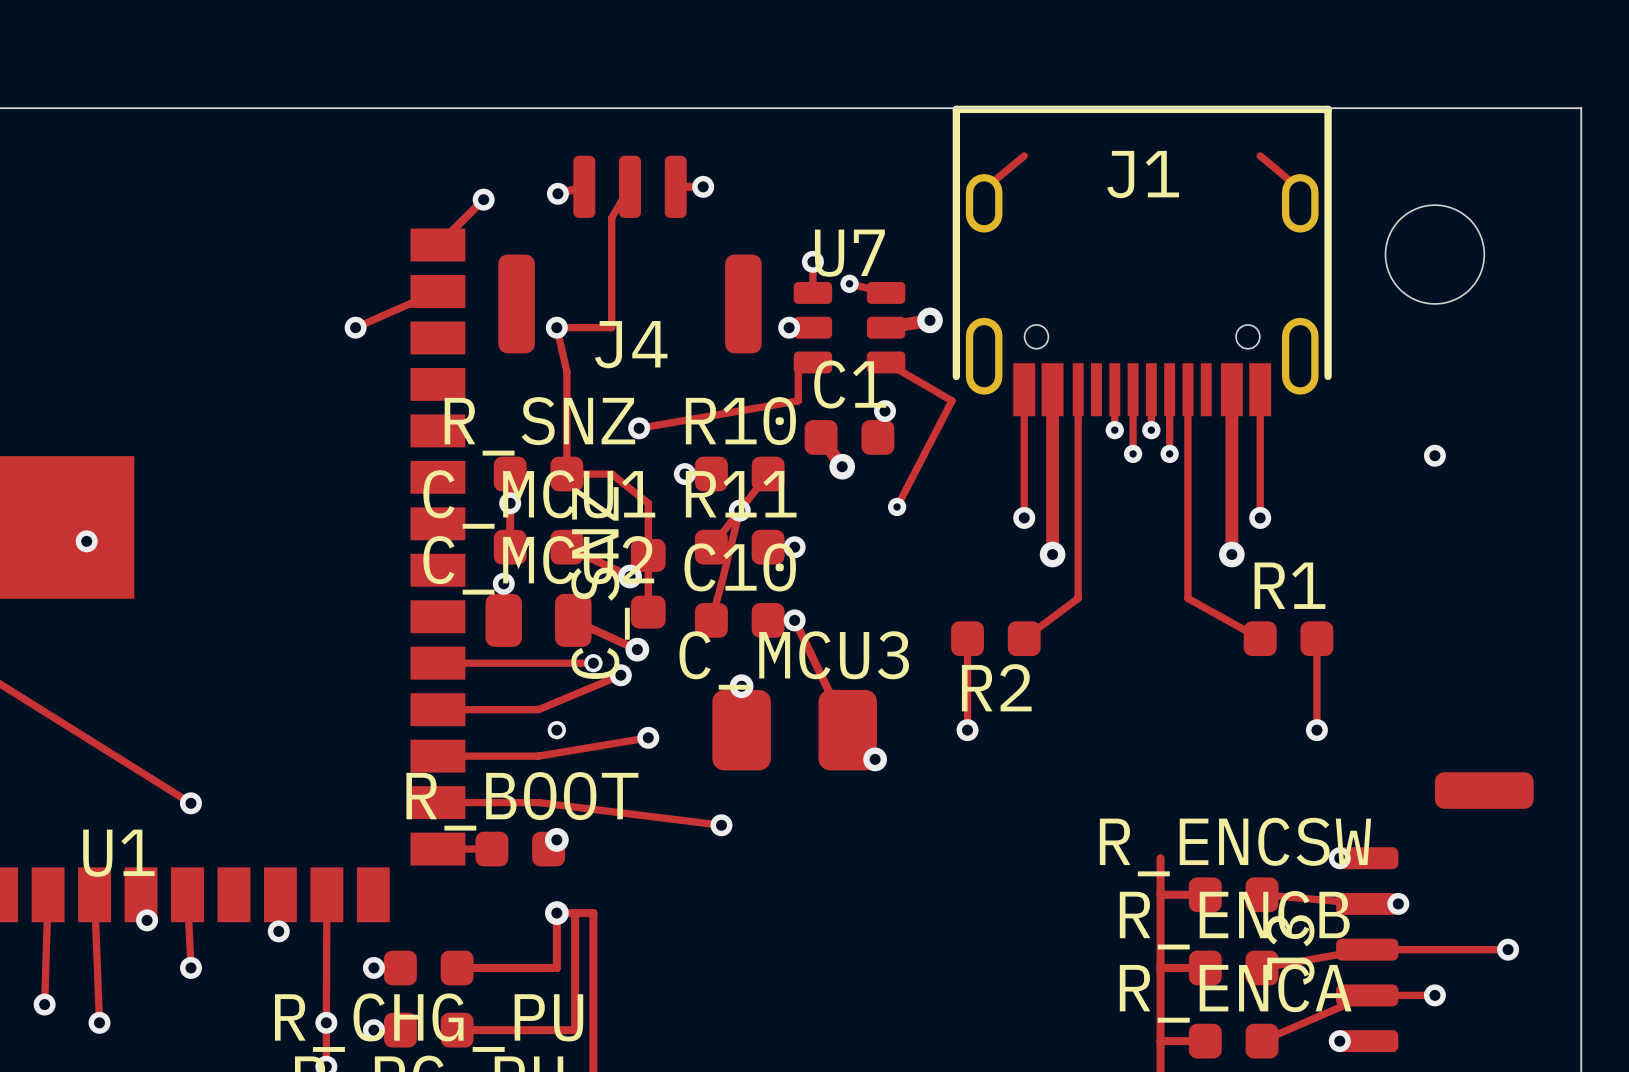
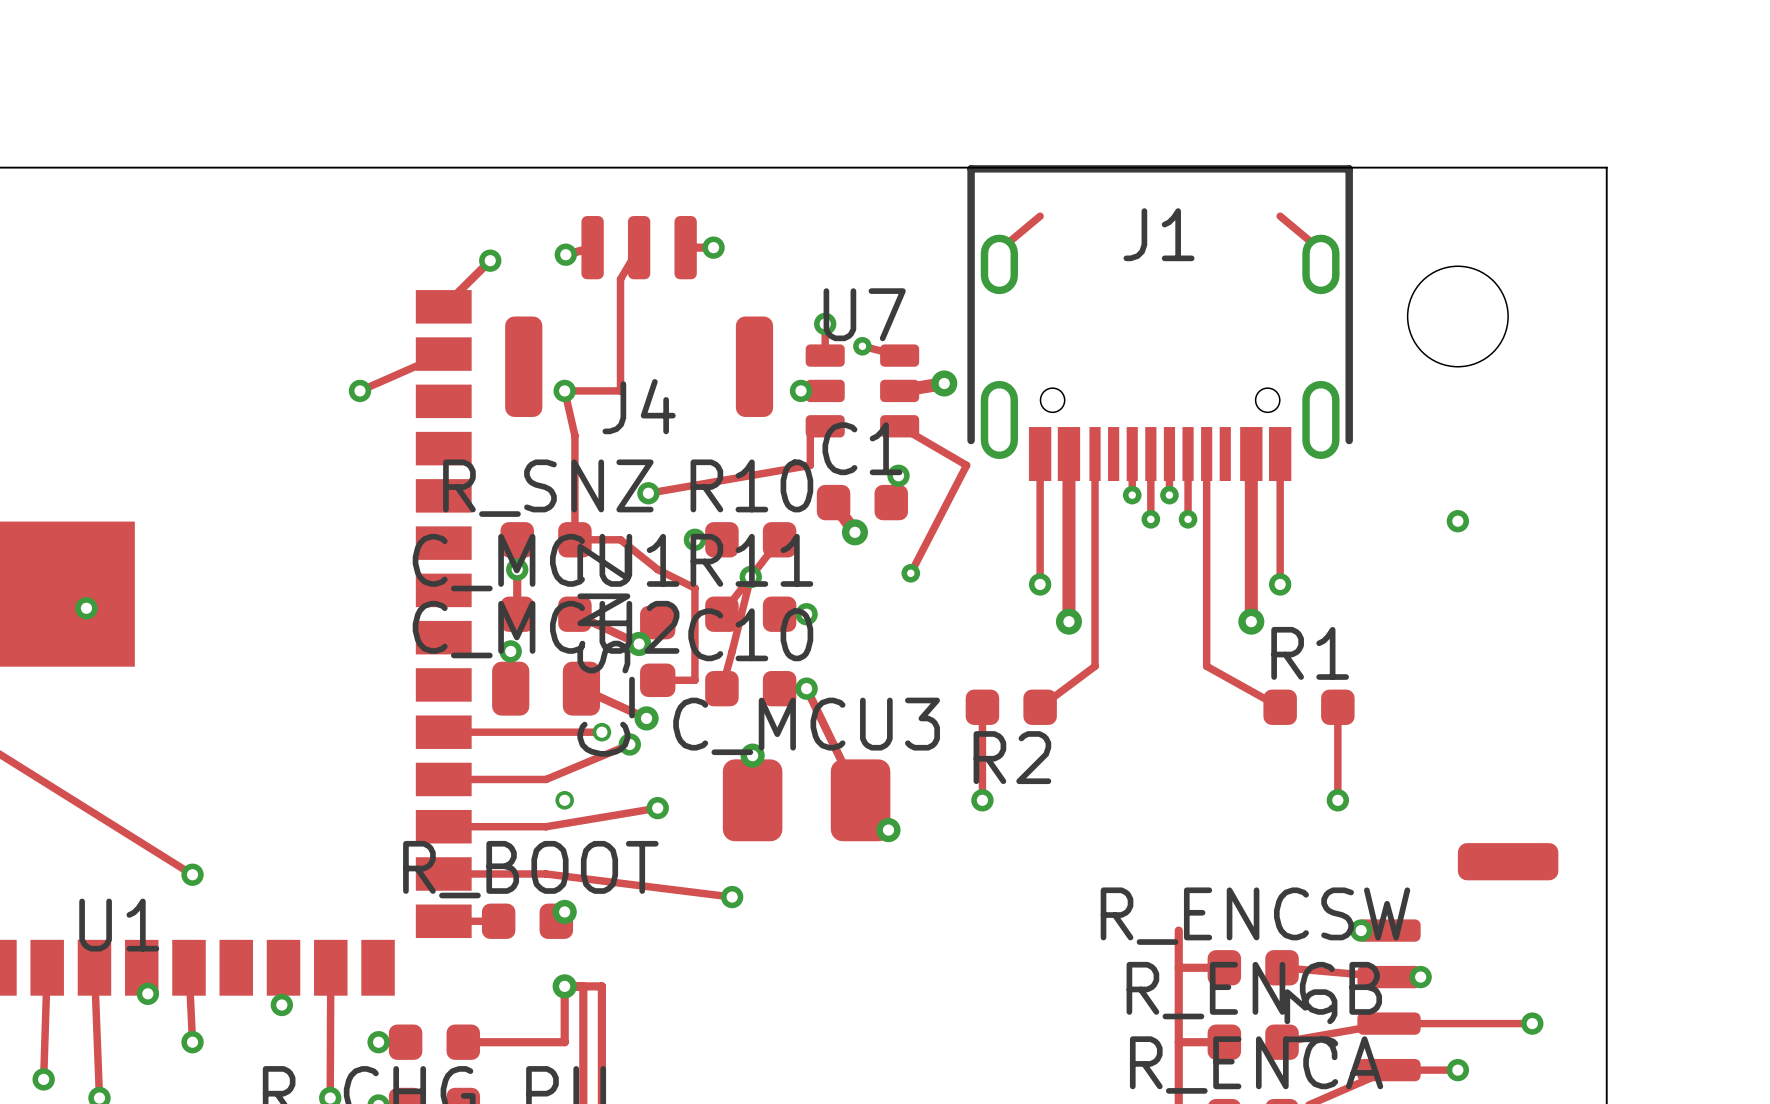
track: (648, 503) (648, 612) -> (657, 569) (694, 588) (694, 680) (657, 680)

